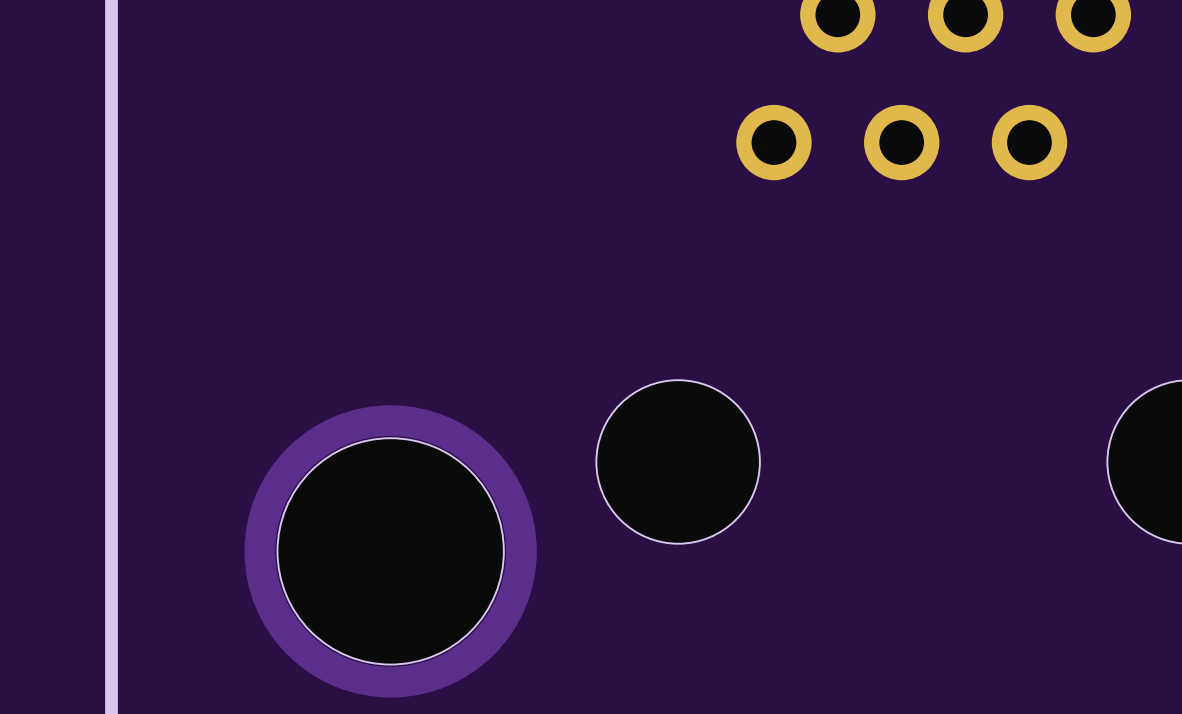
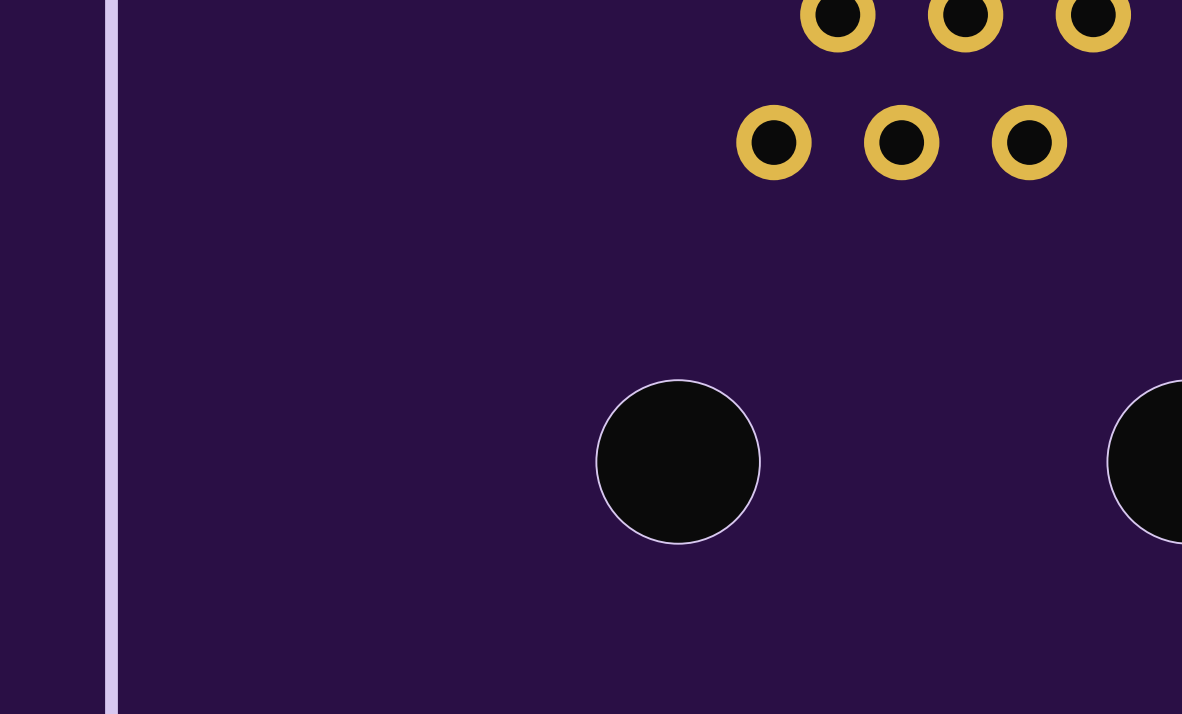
part: (390, 551) -> none

